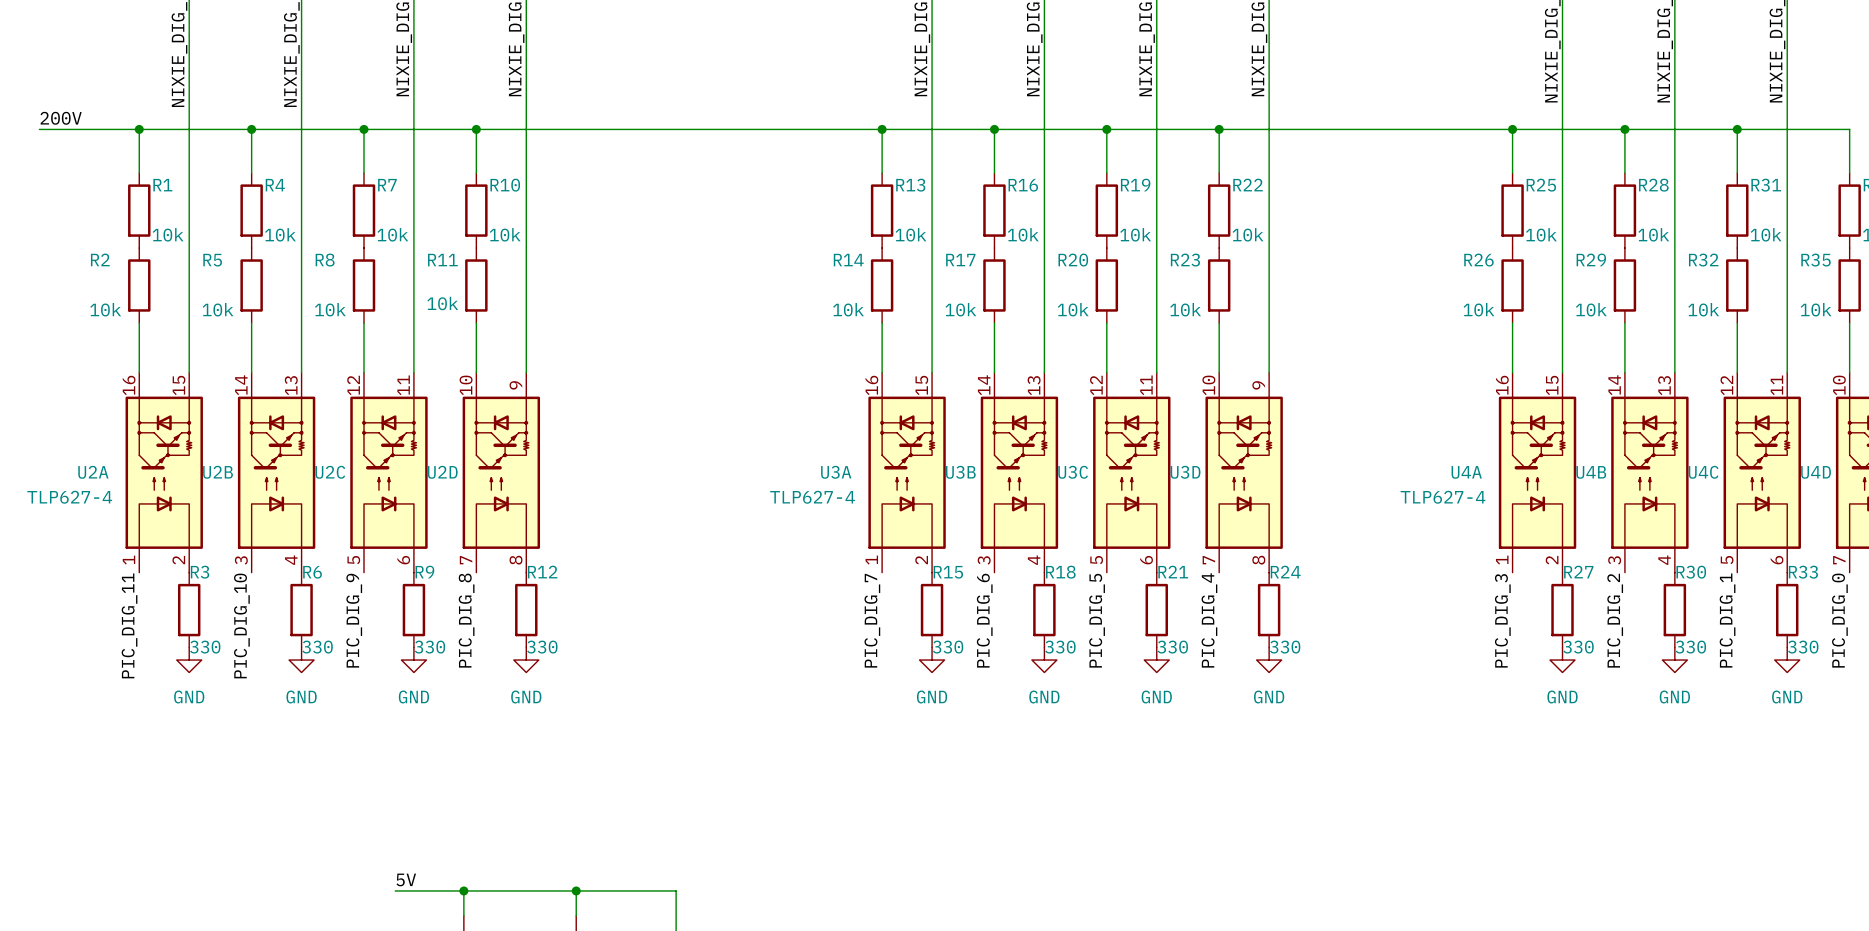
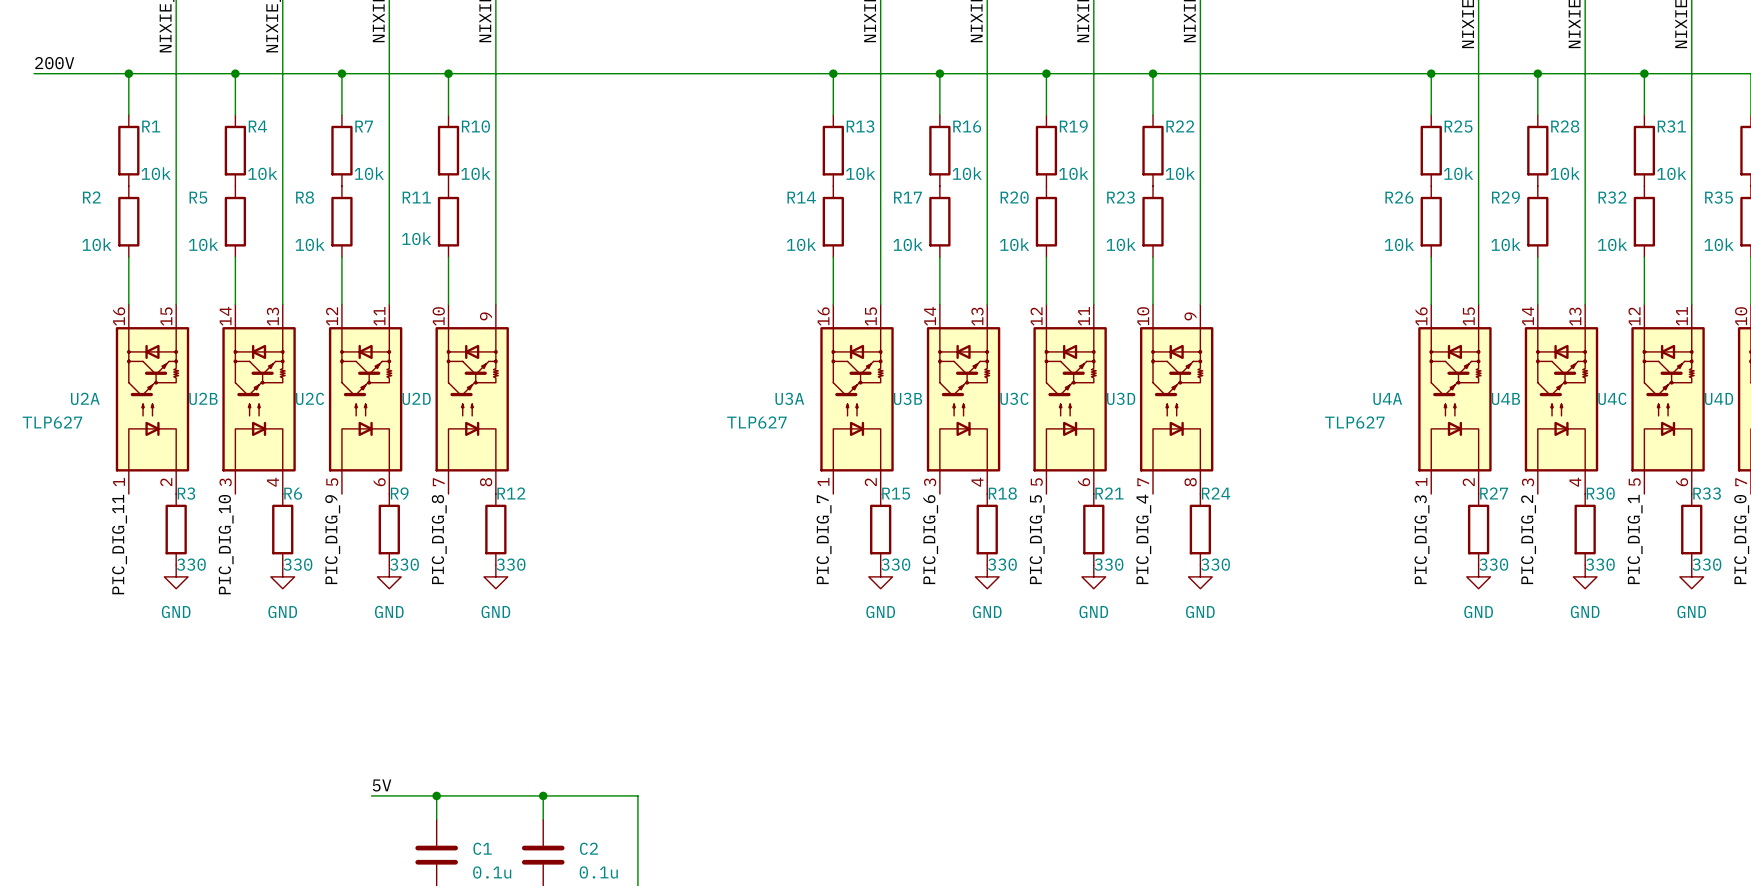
U2A value: TLP627-4 (69, 497) -> TLP627 (52, 422)
U3A value: TLP627-4 (812, 497) -> TLP627 (756, 422)
U4A value: TLP627-4 (1443, 497) -> TLP627 (1354, 422)

